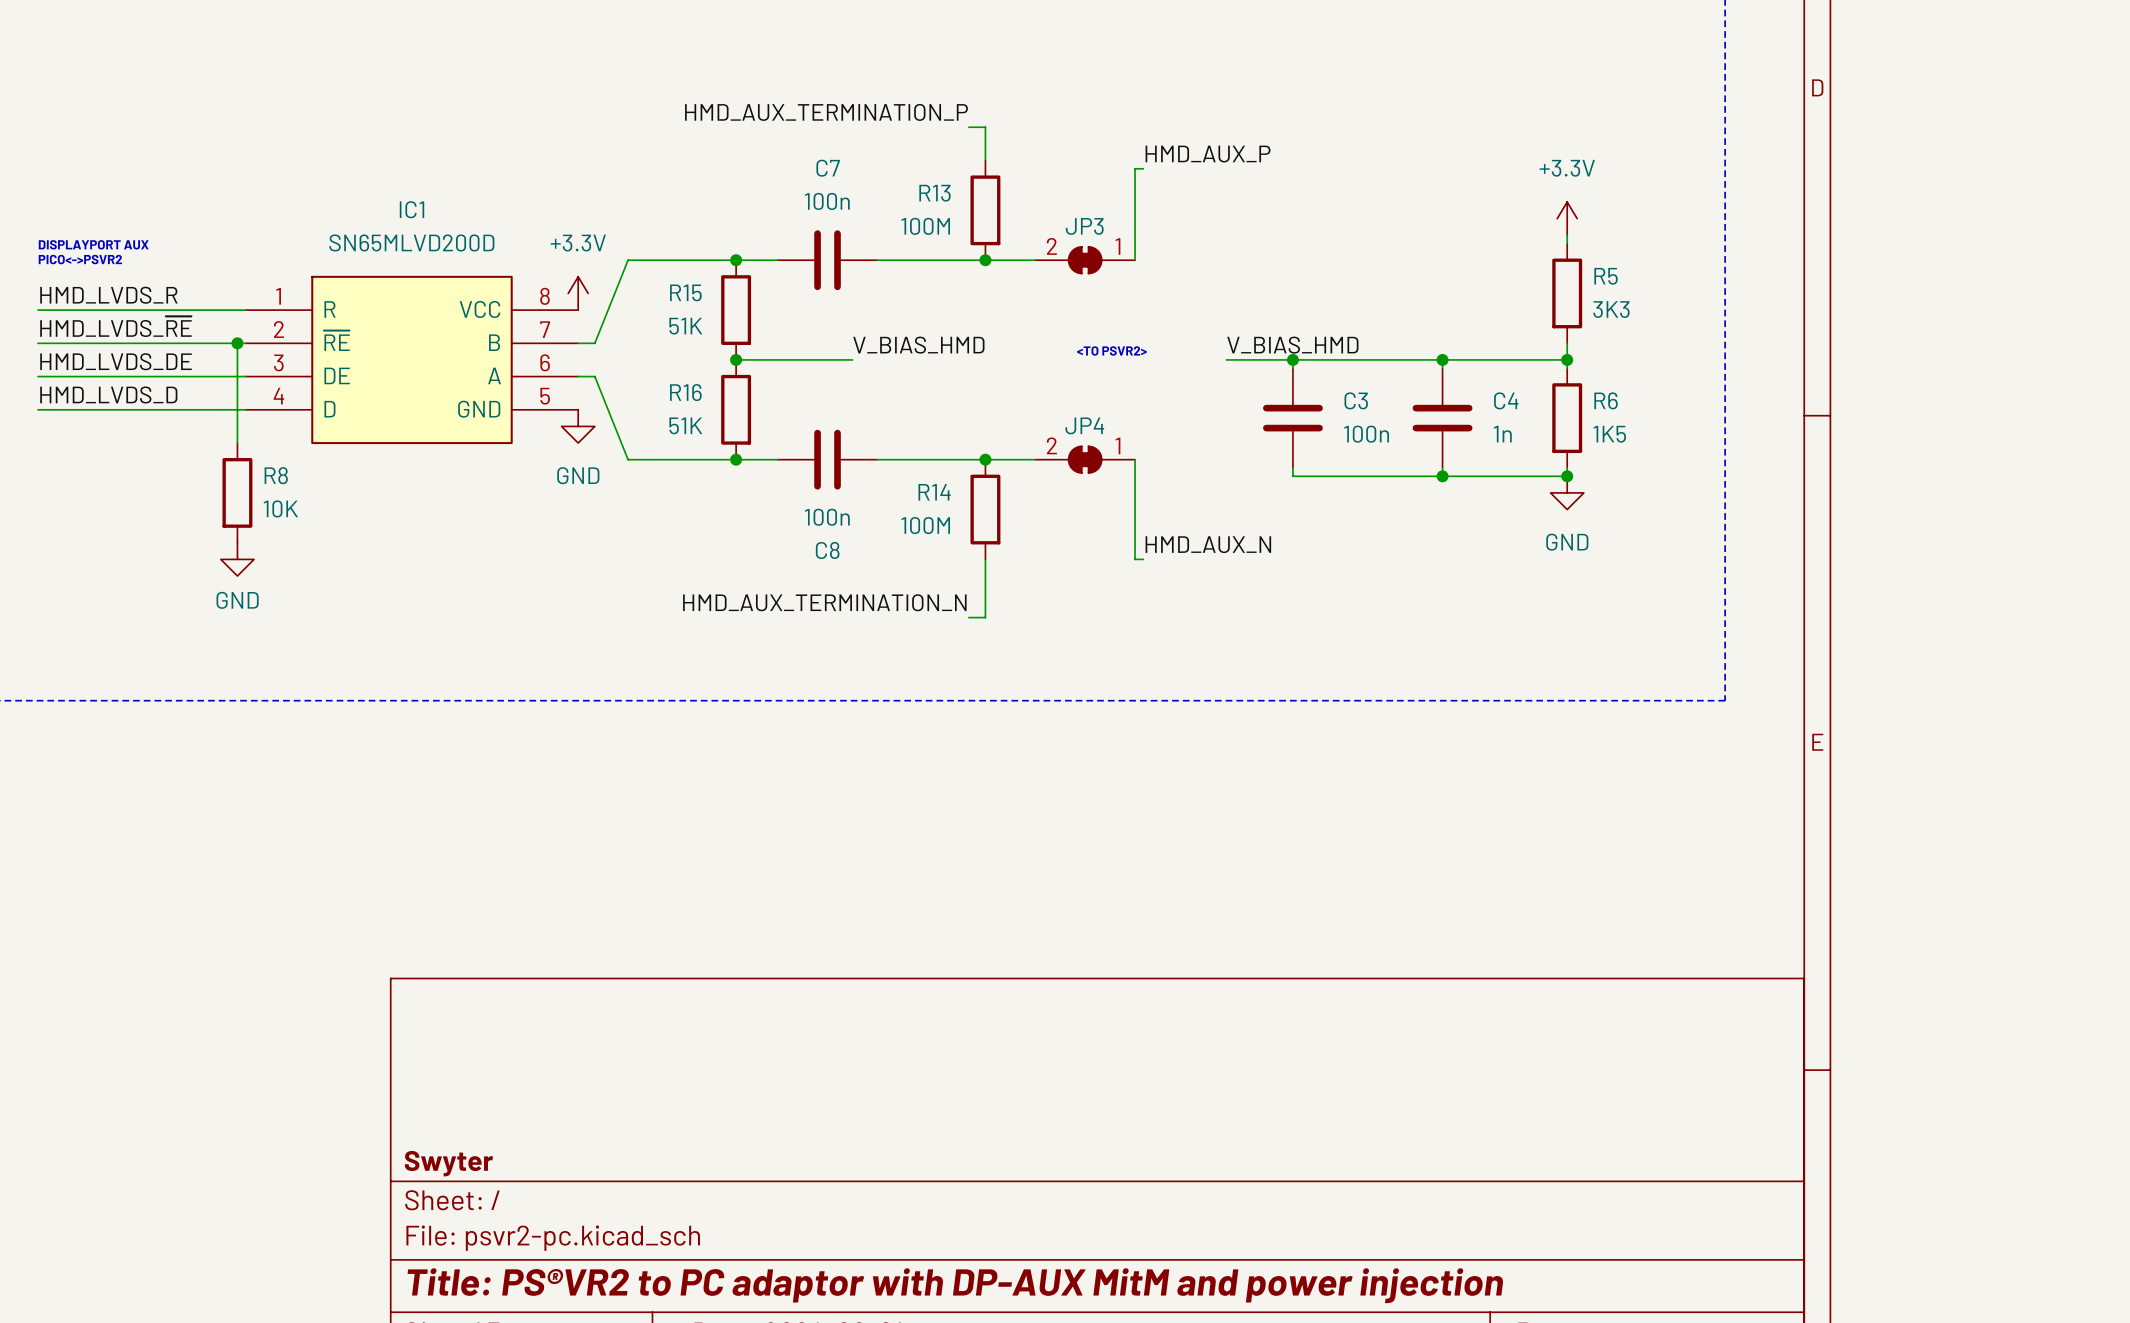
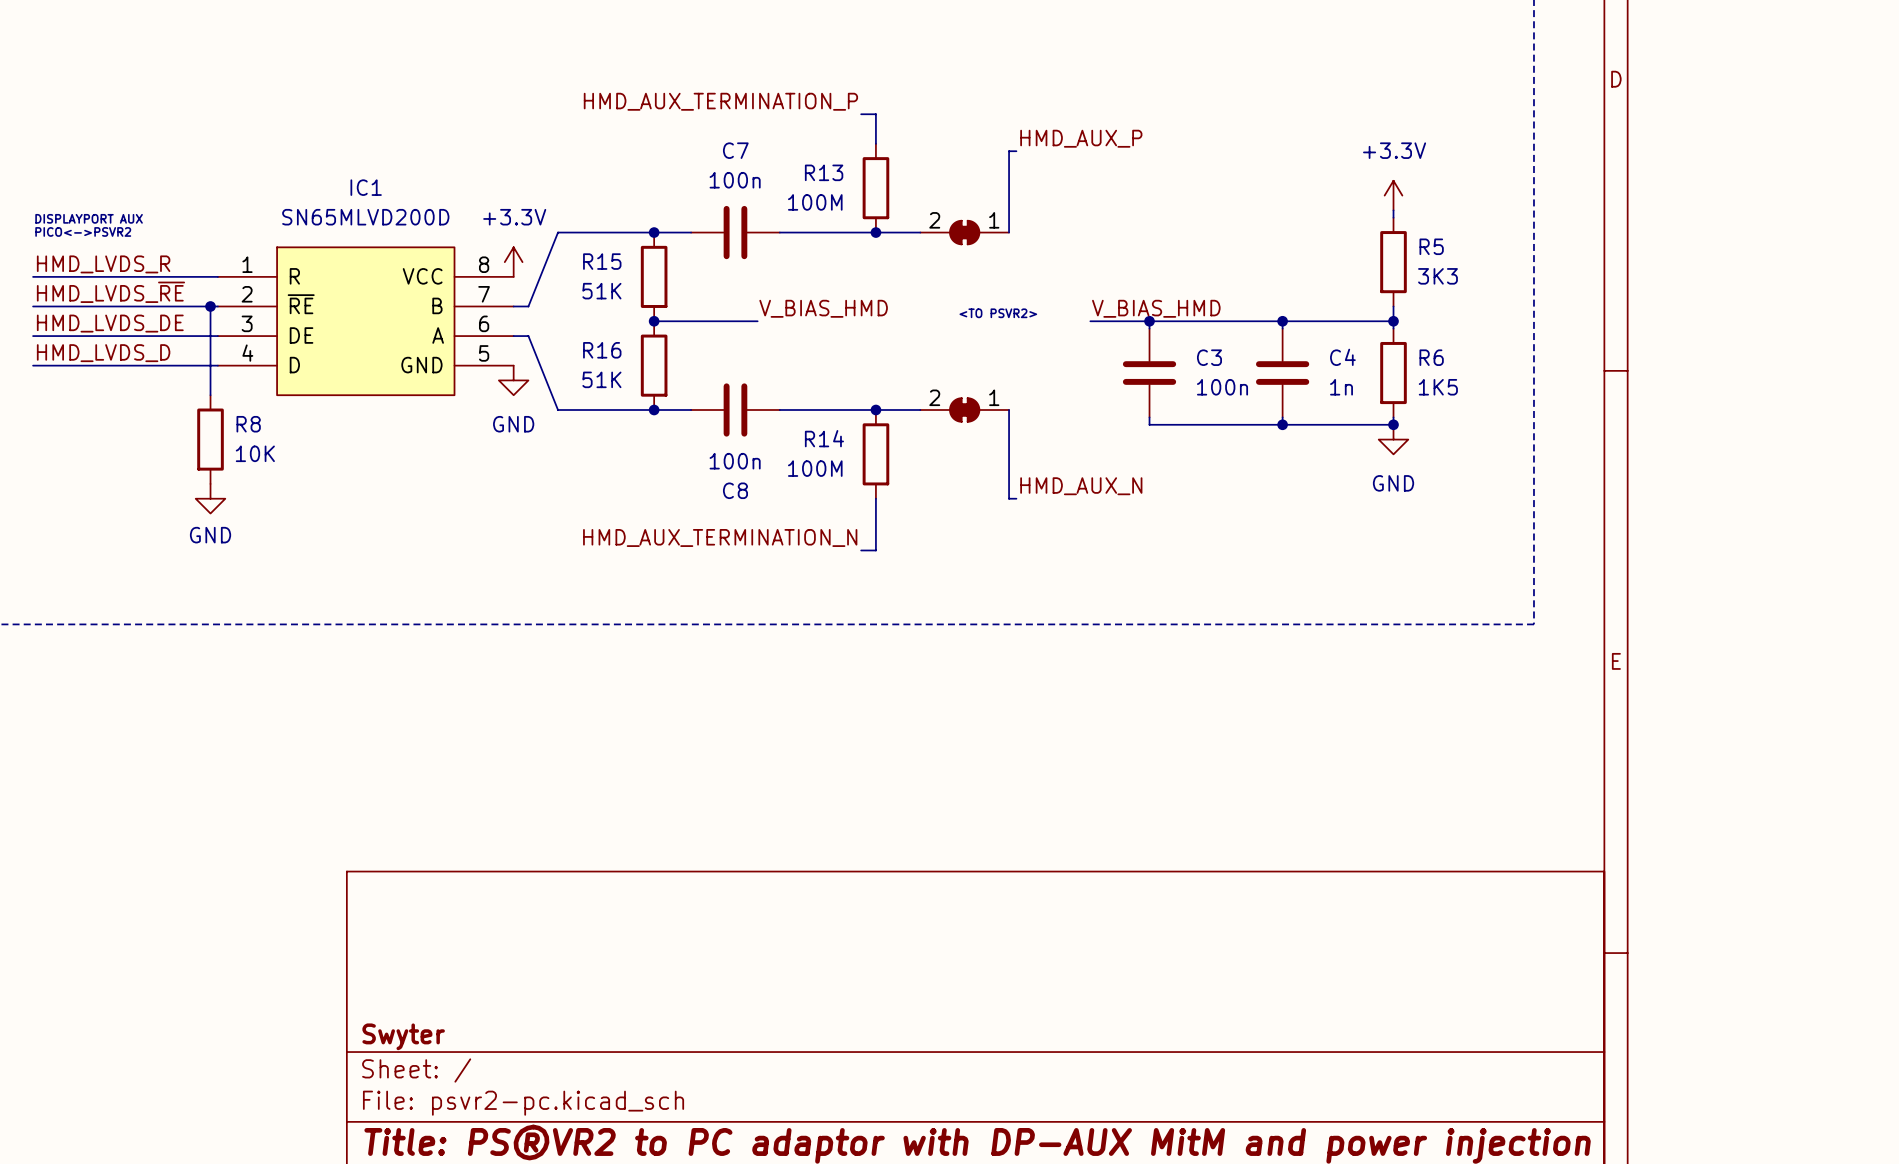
JP3 name: JP3 (1084, 226) -> none
JP4 name: JP4 (1084, 425) -> none

